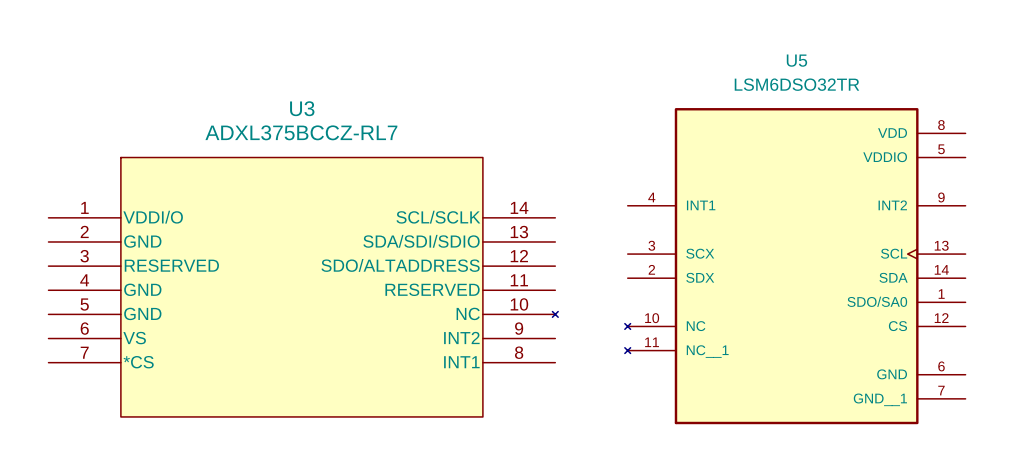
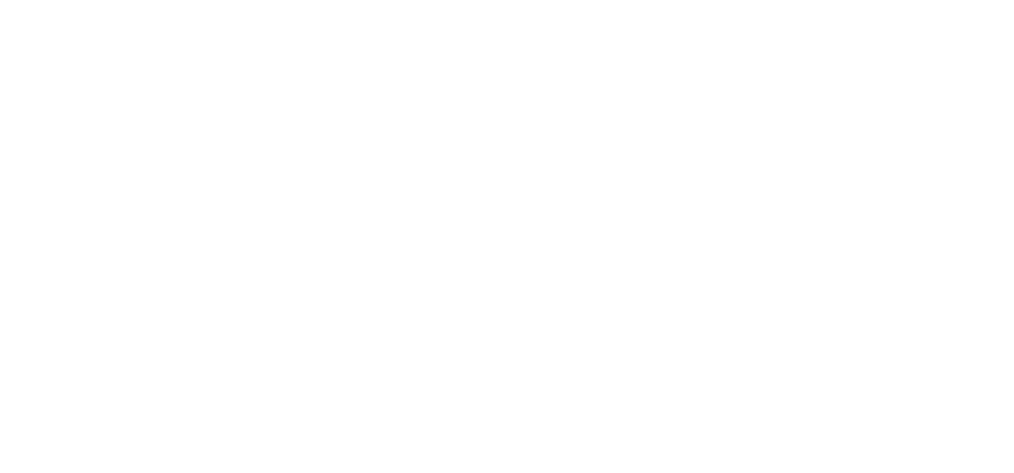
U5: LSM6DSO32TR (795, 266) -> none
U3: ADXL375BCCZ-RL7 (303, 287) -> none

